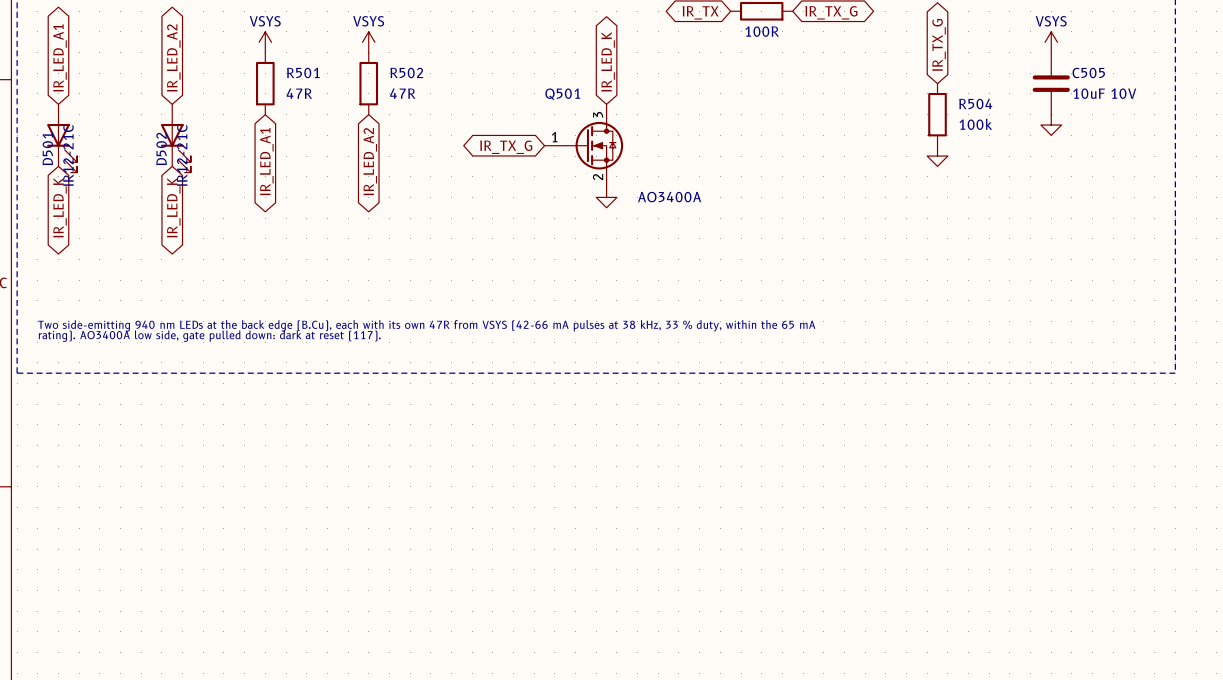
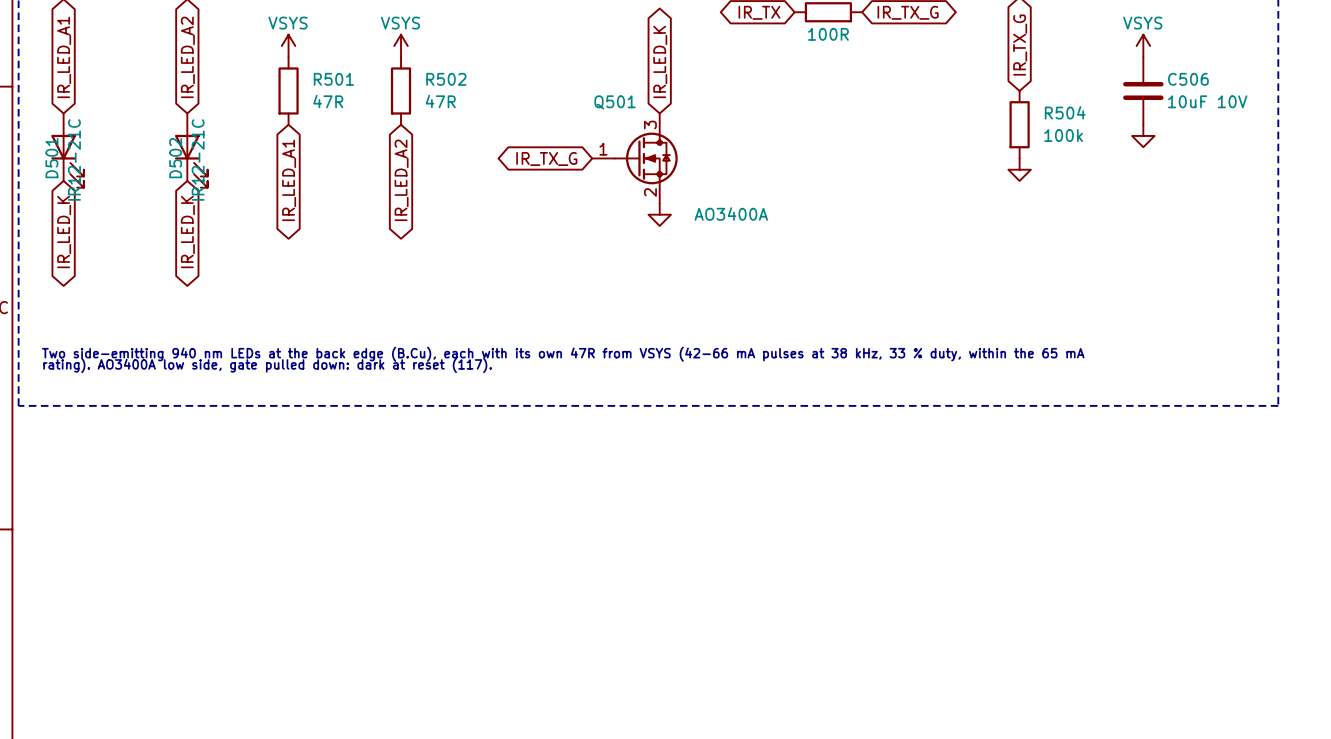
C505 name: C505 (1088, 72) -> C506 (1188, 79)

